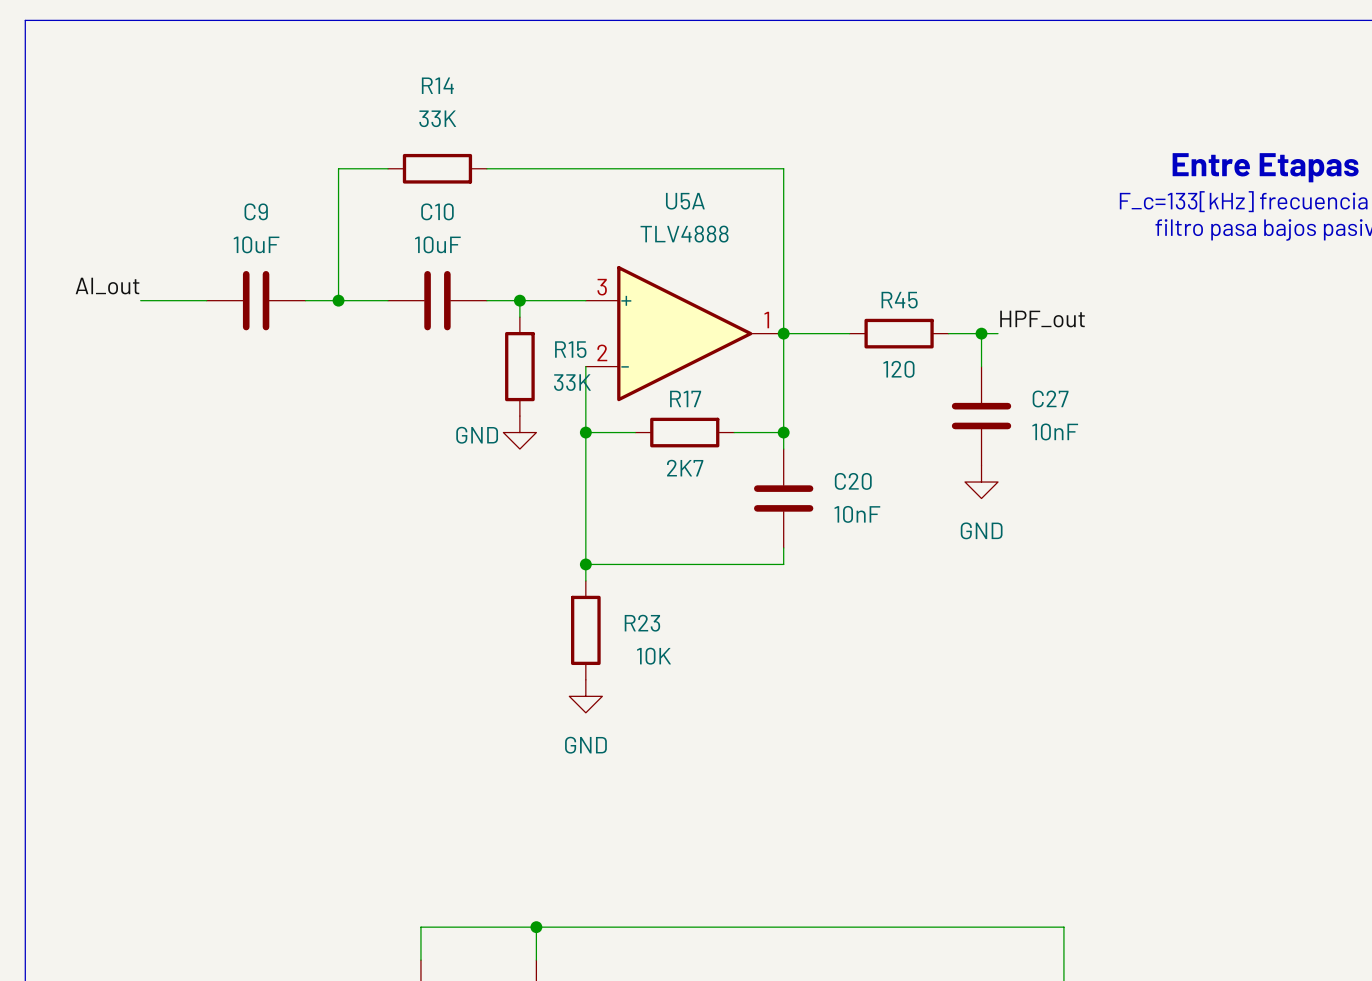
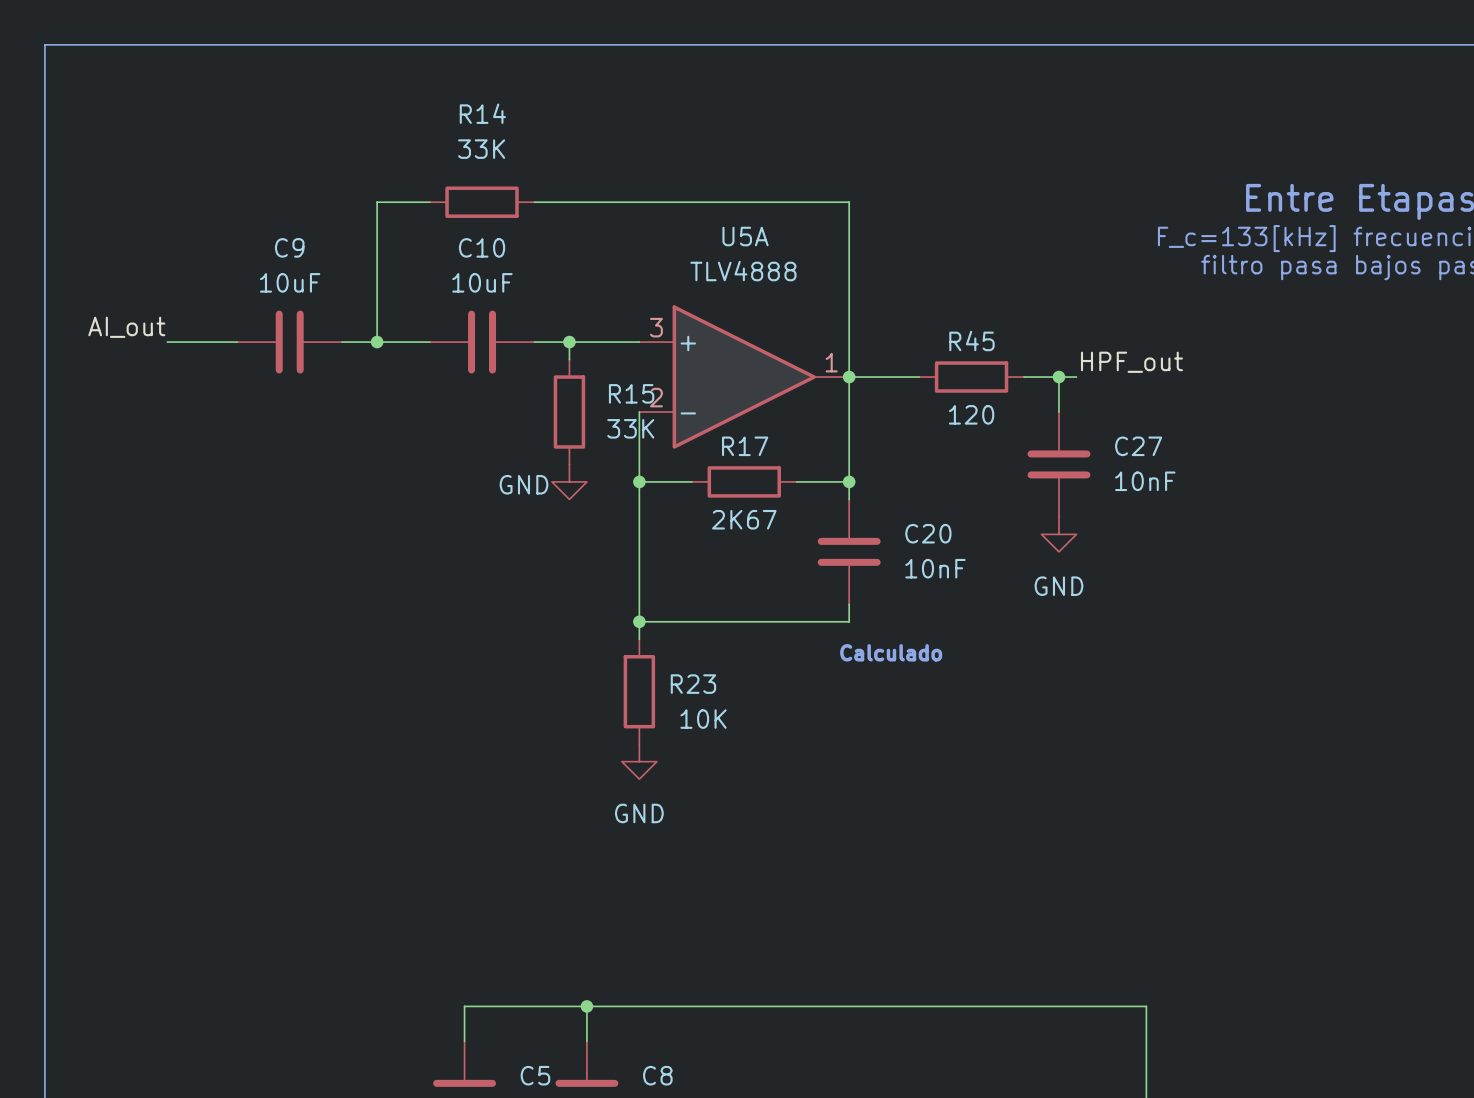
R17 value: 2K7 (685, 468) -> 2K67 (744, 519)
text: none -> Calculado (891, 652)

